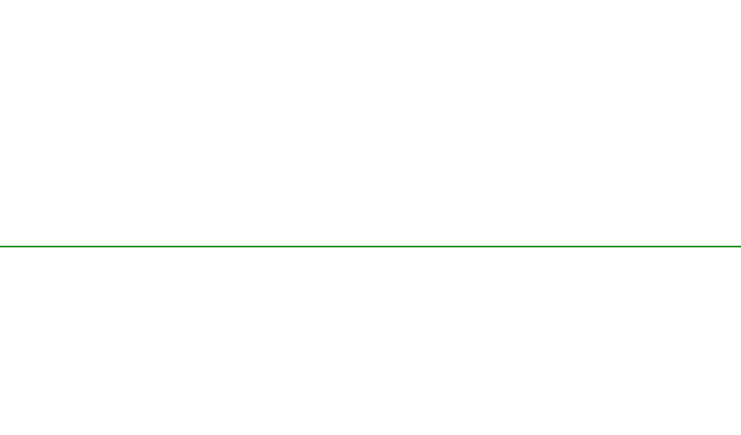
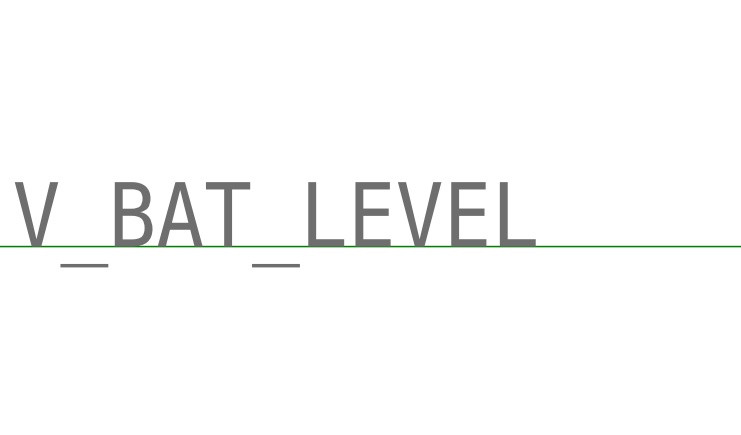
label: none -> V_BAT_LEVEL (275, 224)

